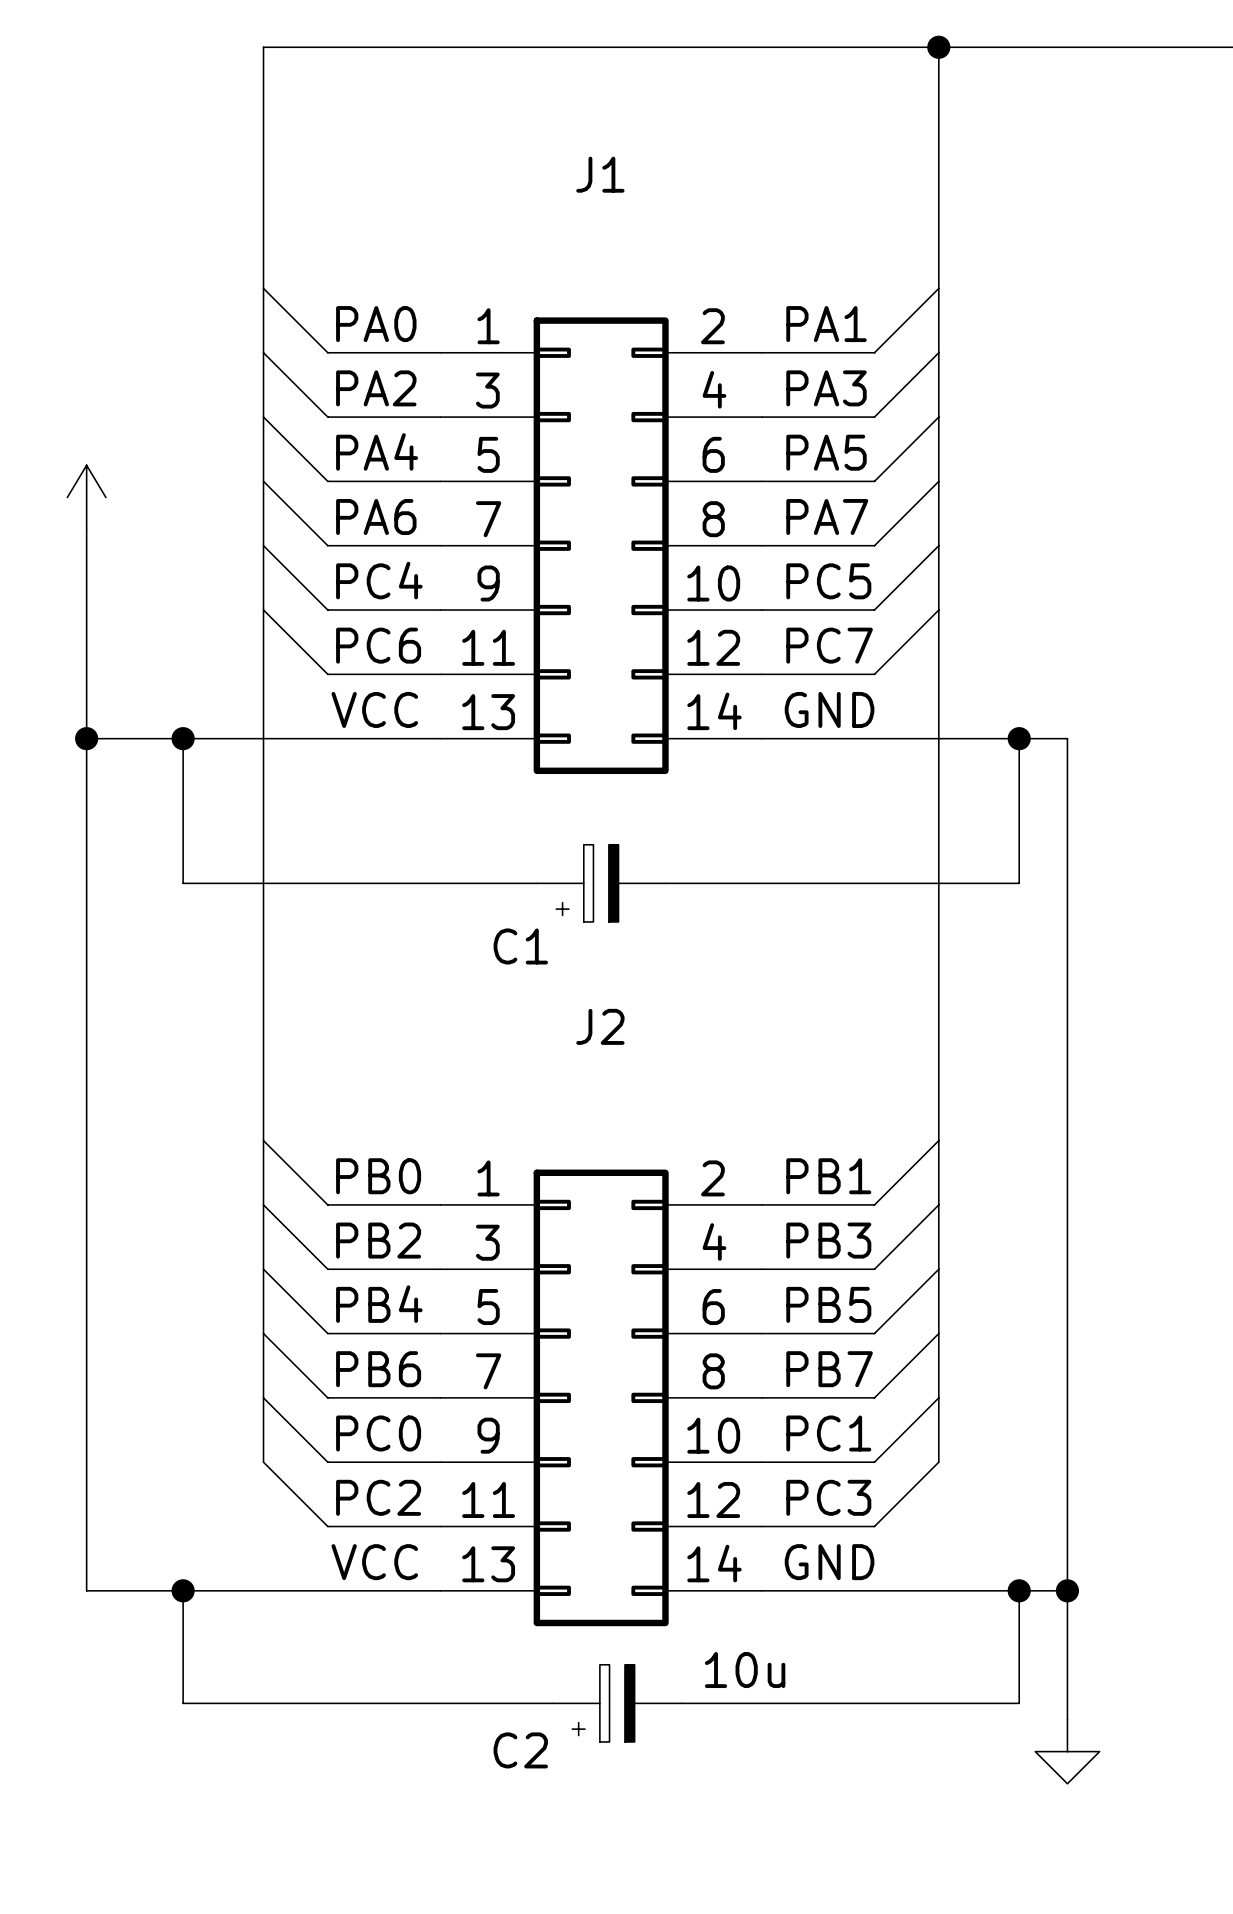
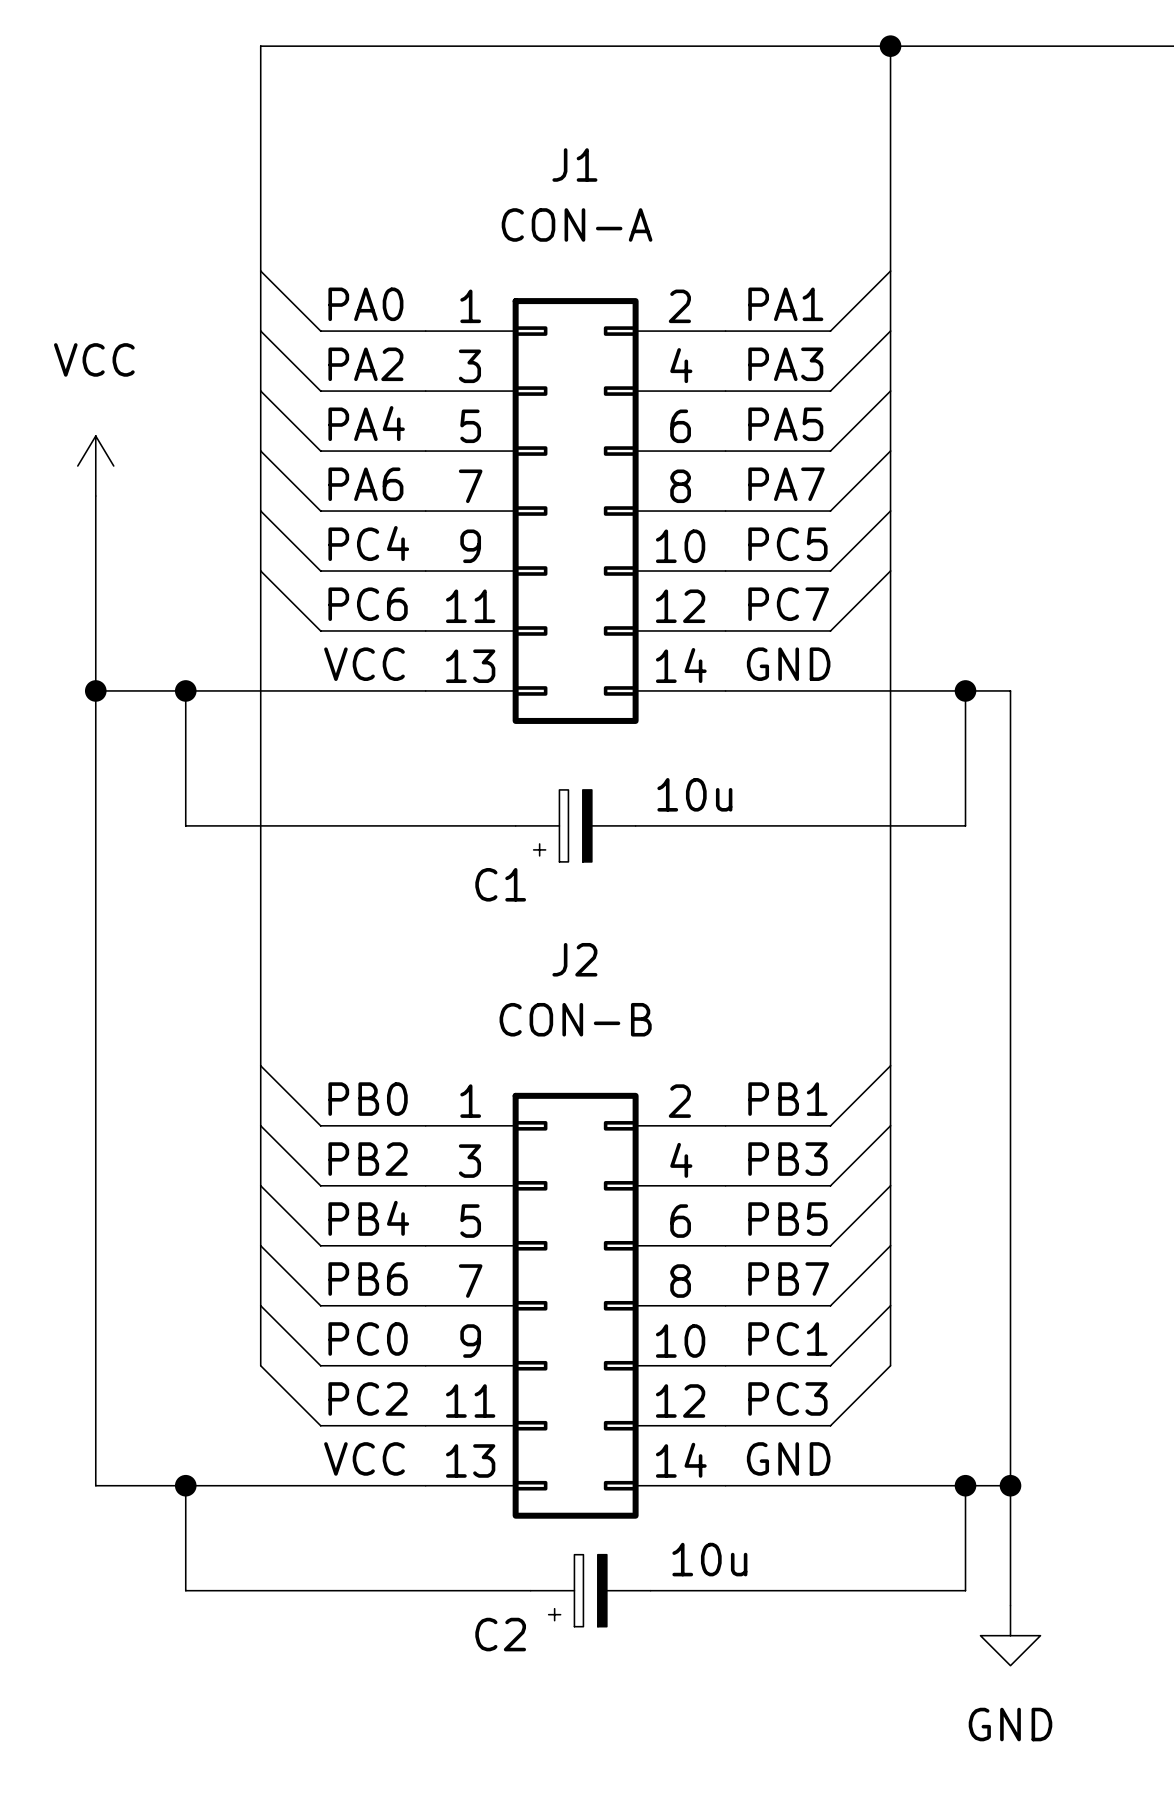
J1 value: none -> CON-A (577, 224)
power symbol text: none -> VCC (94, 359)
C1 value: none -> 10u (694, 794)
J2 value: none -> CON-B (575, 1019)
power symbol text: none -> GND (1010, 1724)

